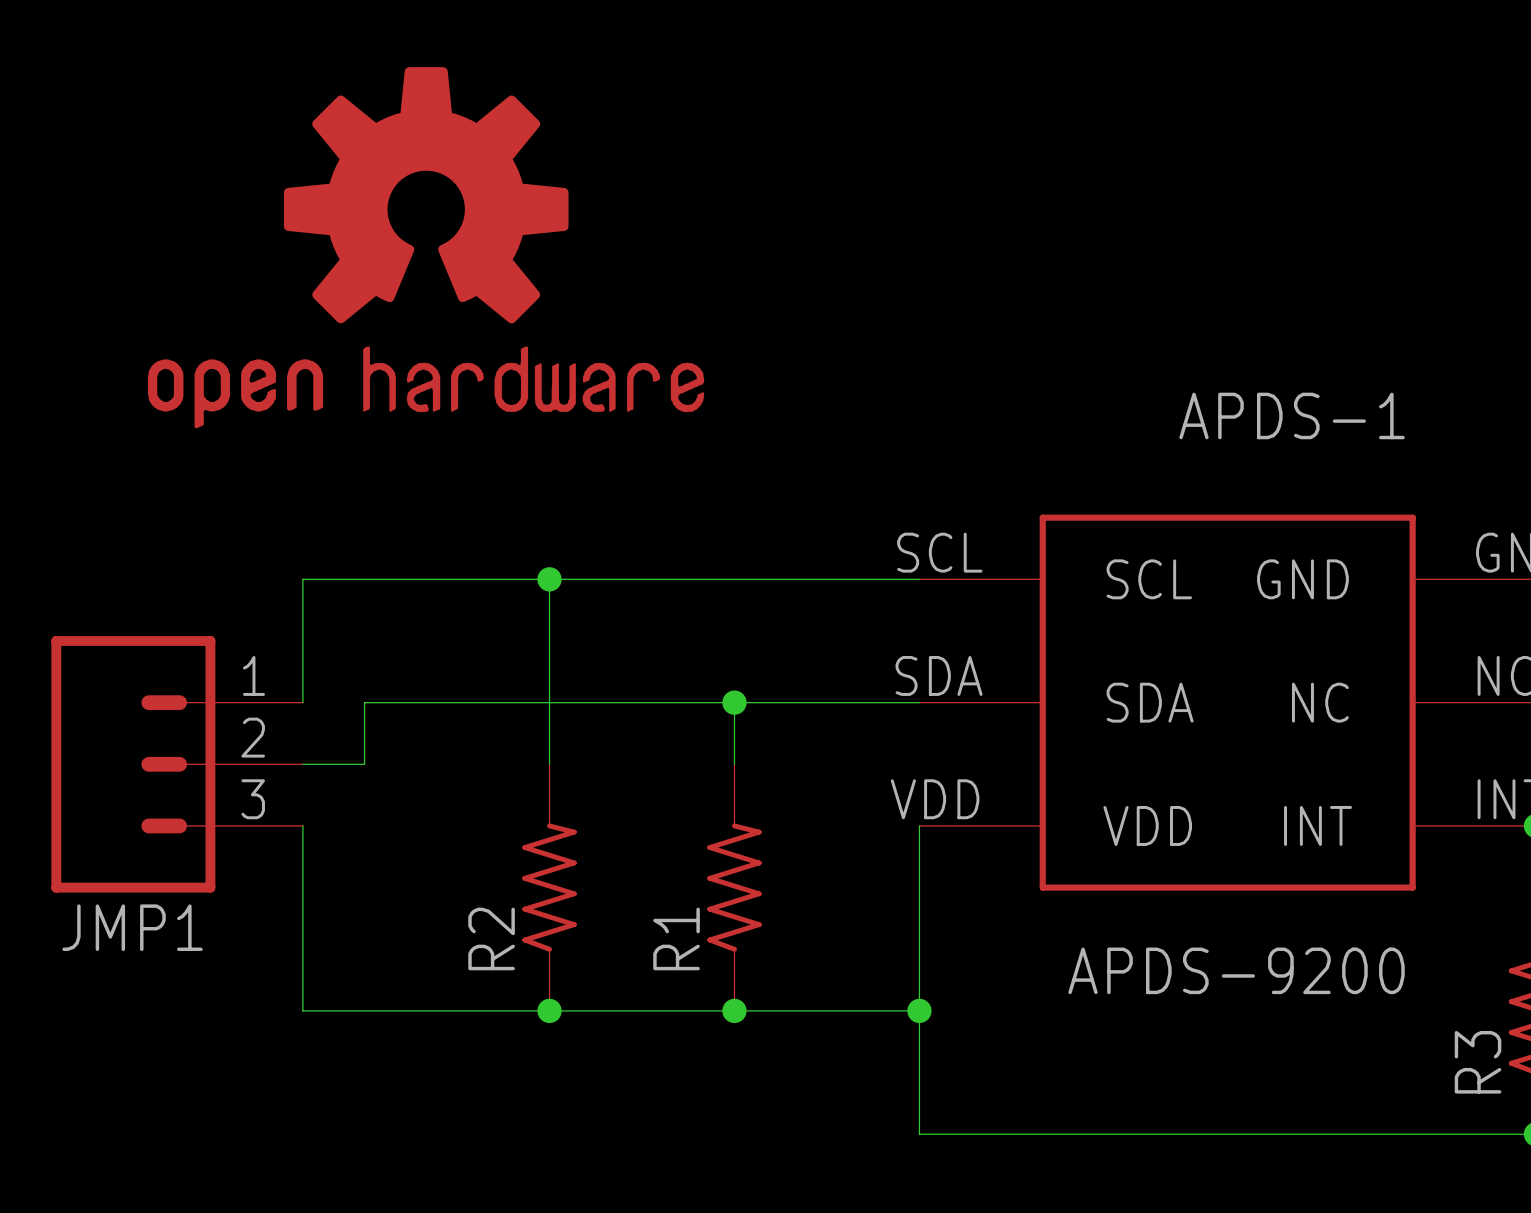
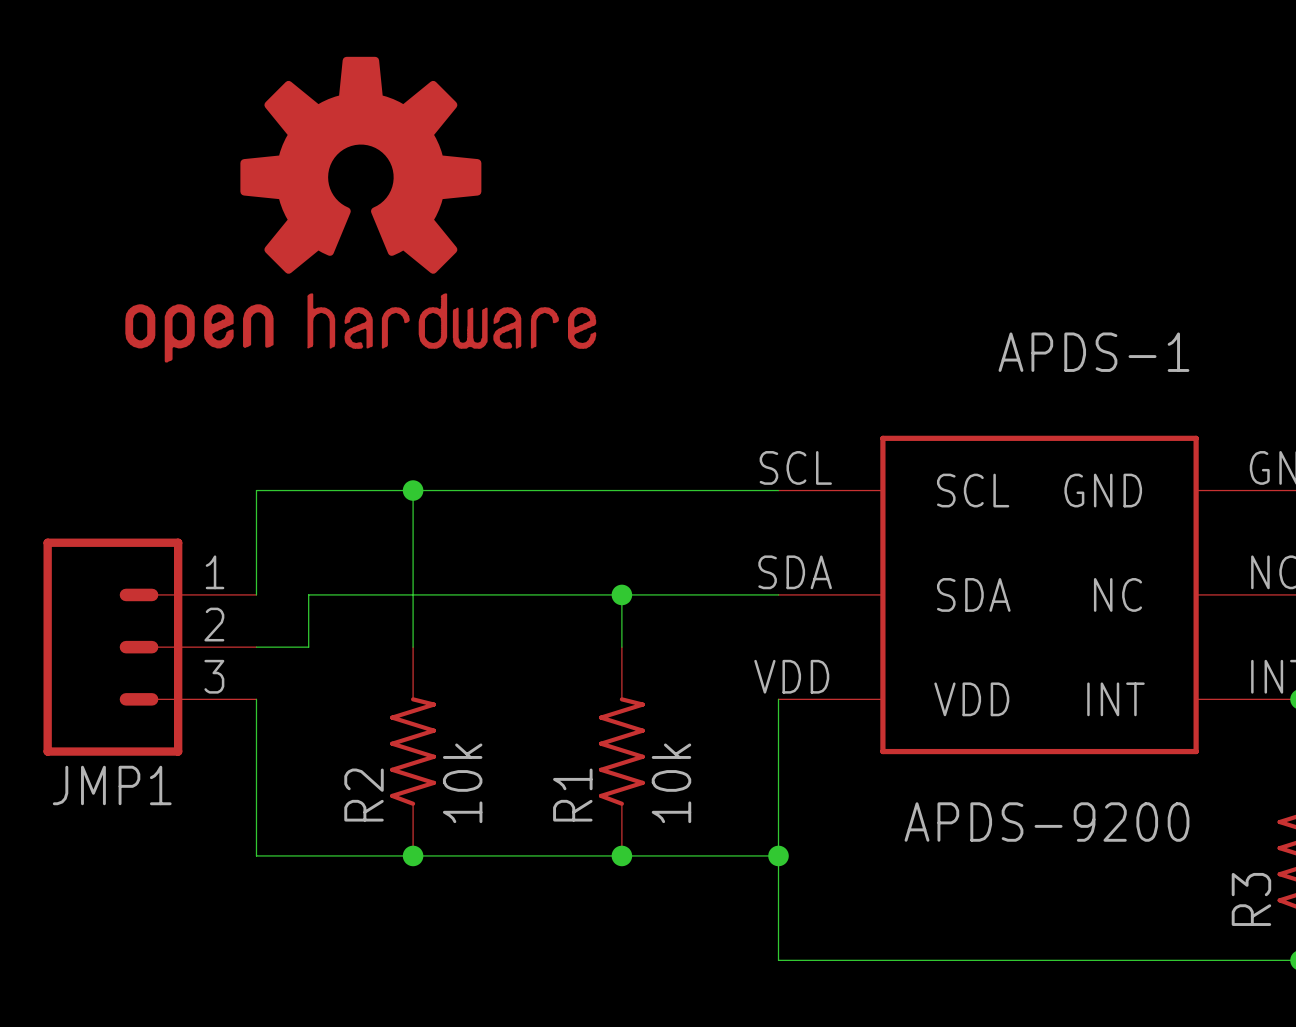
wire: (549, 579) (549, 764) -> (413, 490) (413, 647)
junction position: (549, 579) -> (413, 490)
R2 position: (549, 887) -> (413, 751)
R2 value: none -> 10k (462, 783)
R1 value: none -> 10k (671, 783)
junction position: (549, 1010) -> (413, 855)

